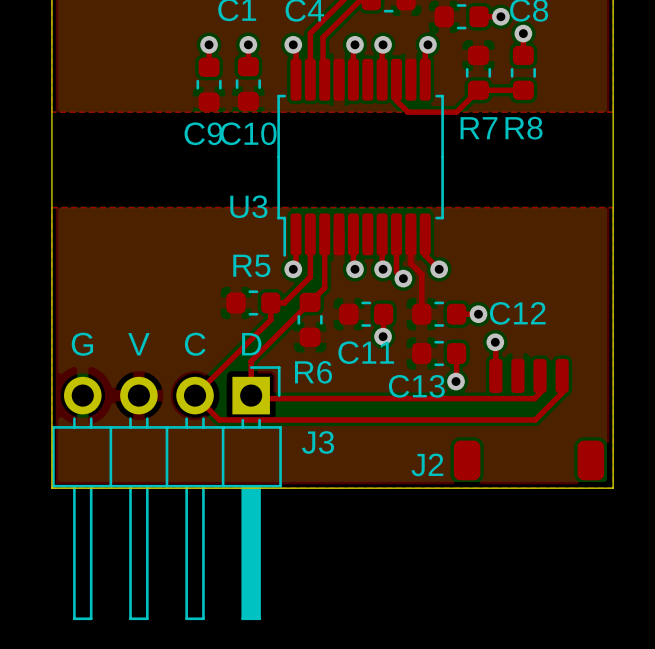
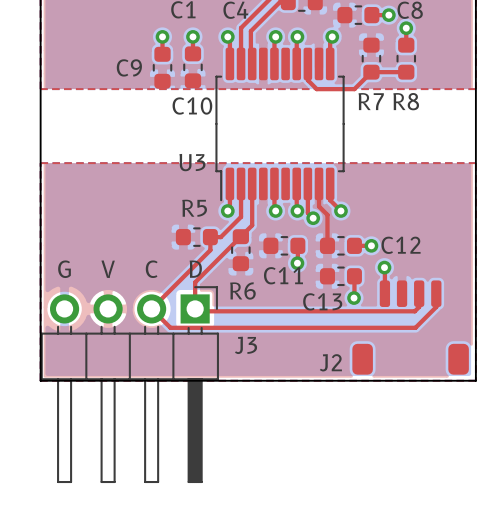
C9 name position: C9 (203, 133) -> C9 (129, 67)

